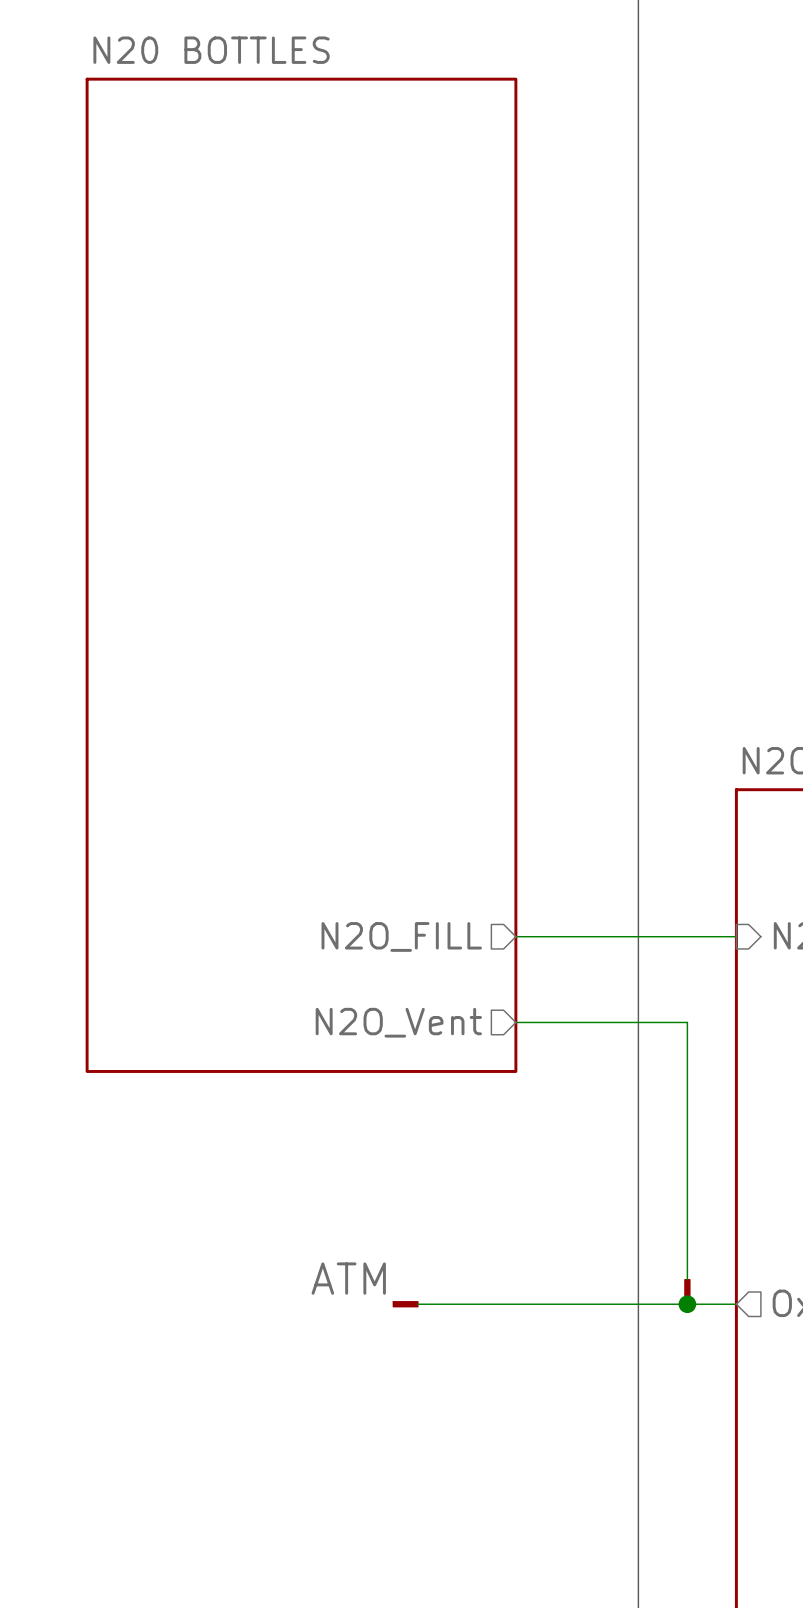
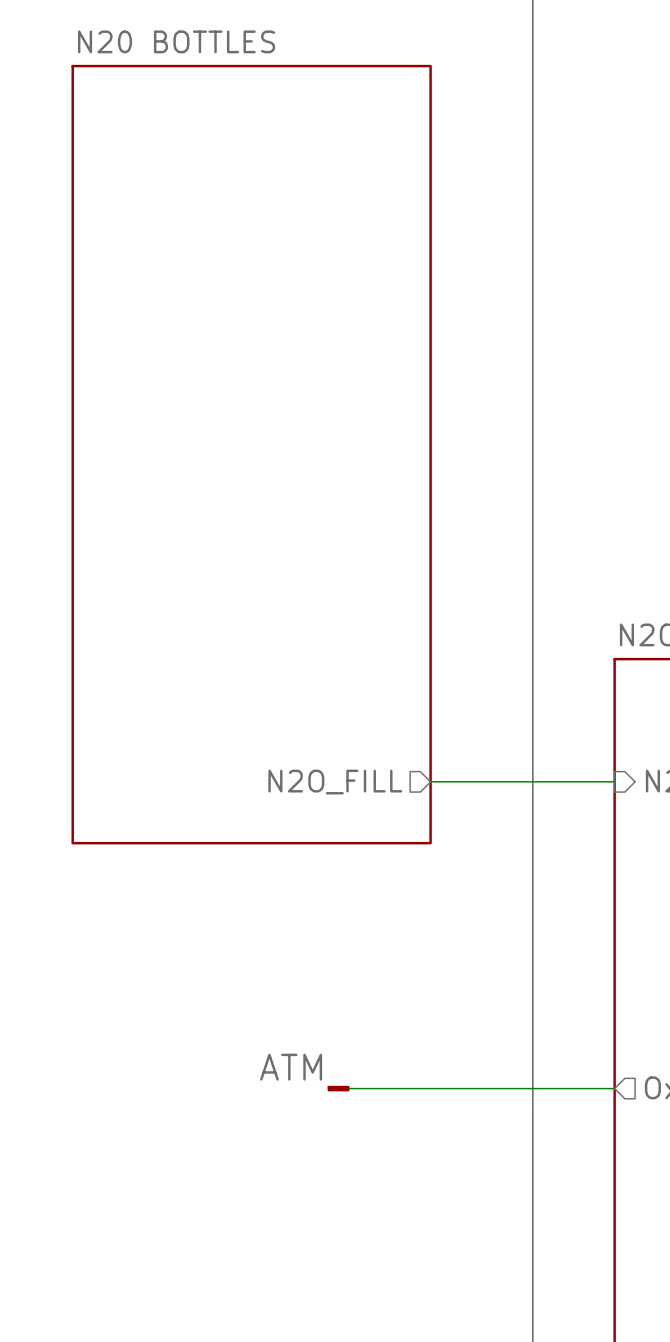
sheet N20 BOTTLES shape: [85, 77, 518, 1073] -> [71, 64, 432, 845]
sheet pin: N2O_Vent (398, 1022) -> none
wire: (515, 1022) (687, 1022) (687, 1279) -> none
part: (687, 1291) -> none
junction: (687, 1304) -> none

